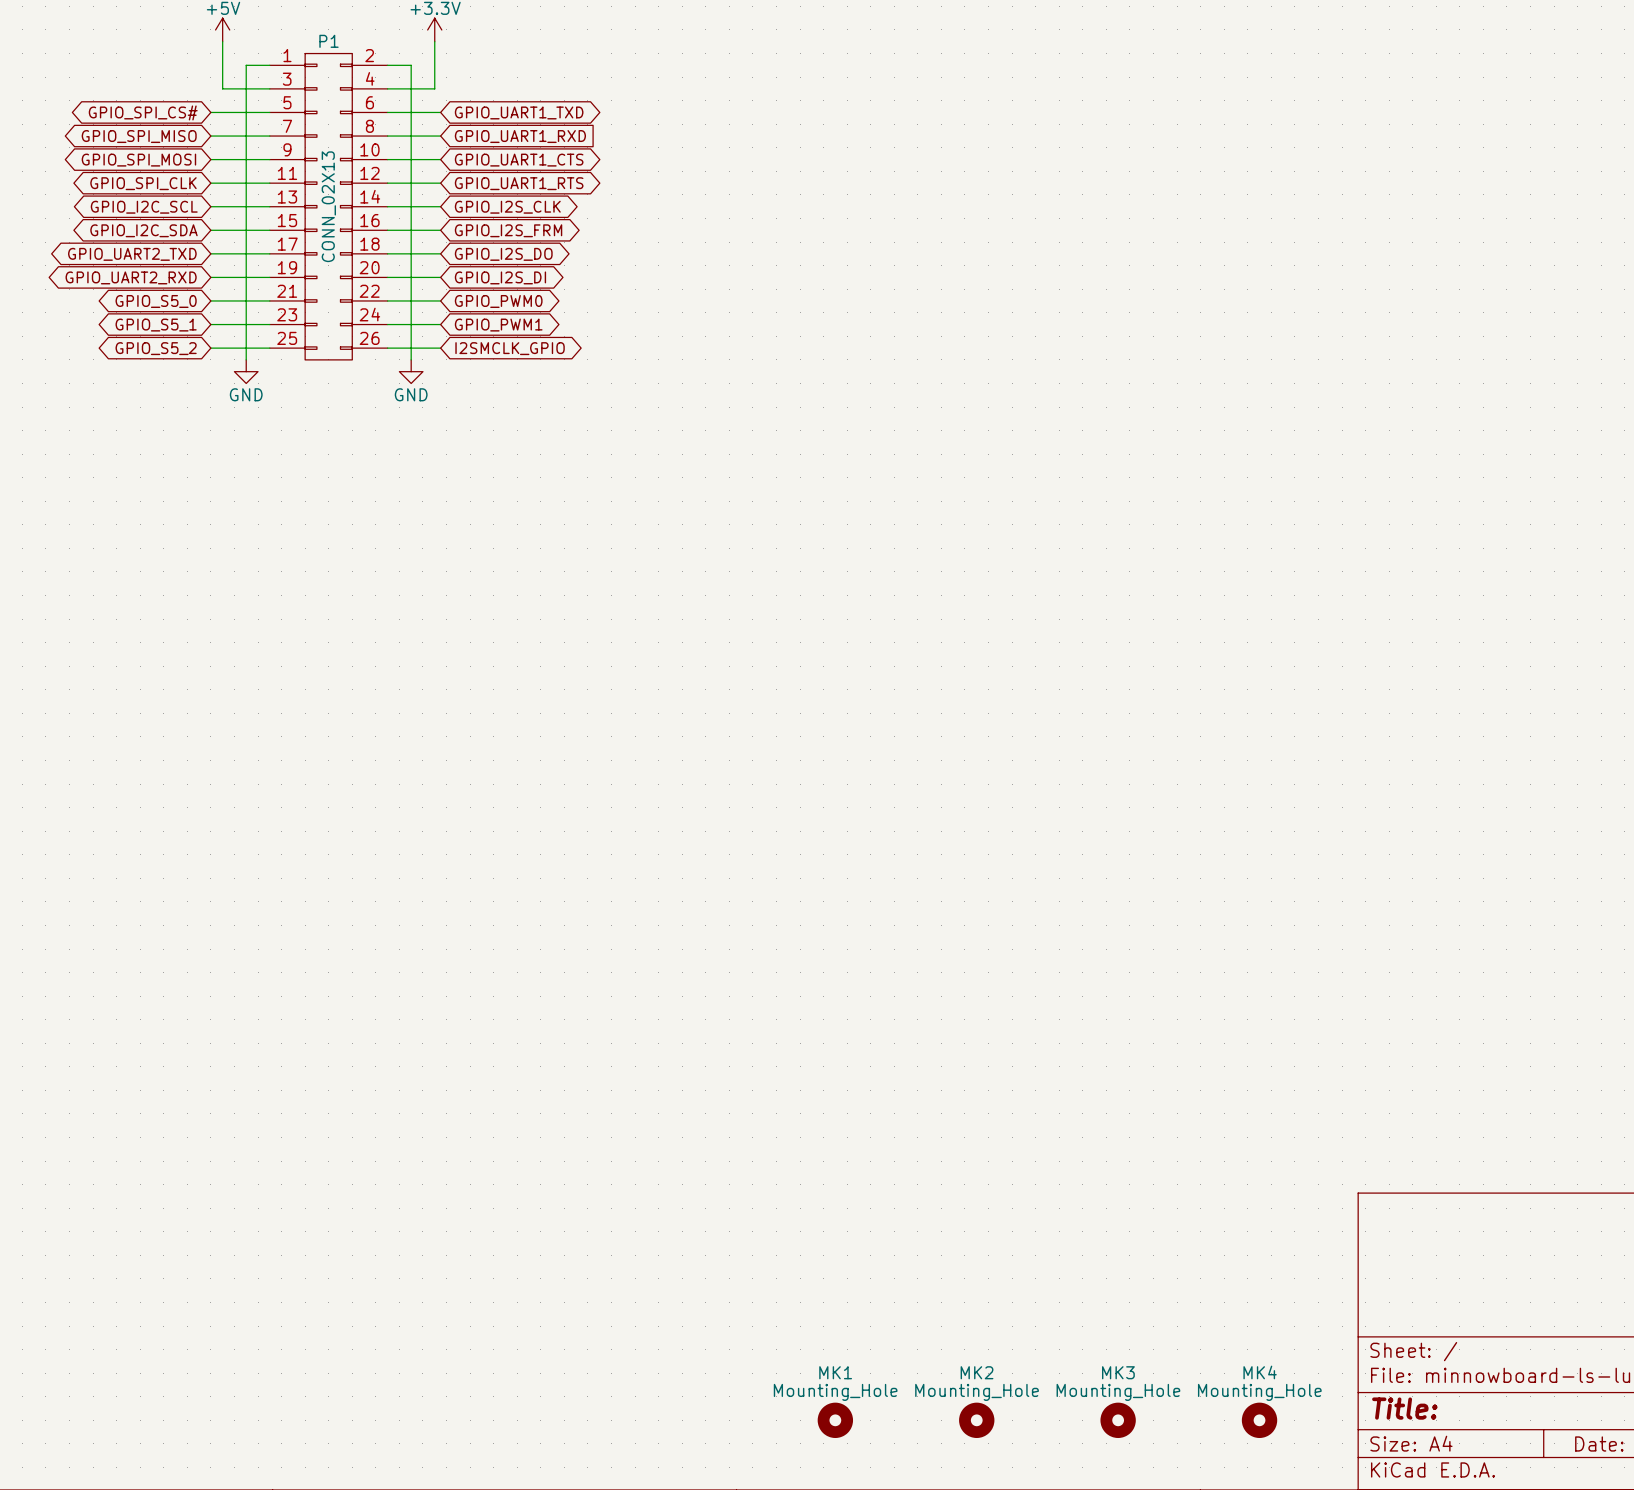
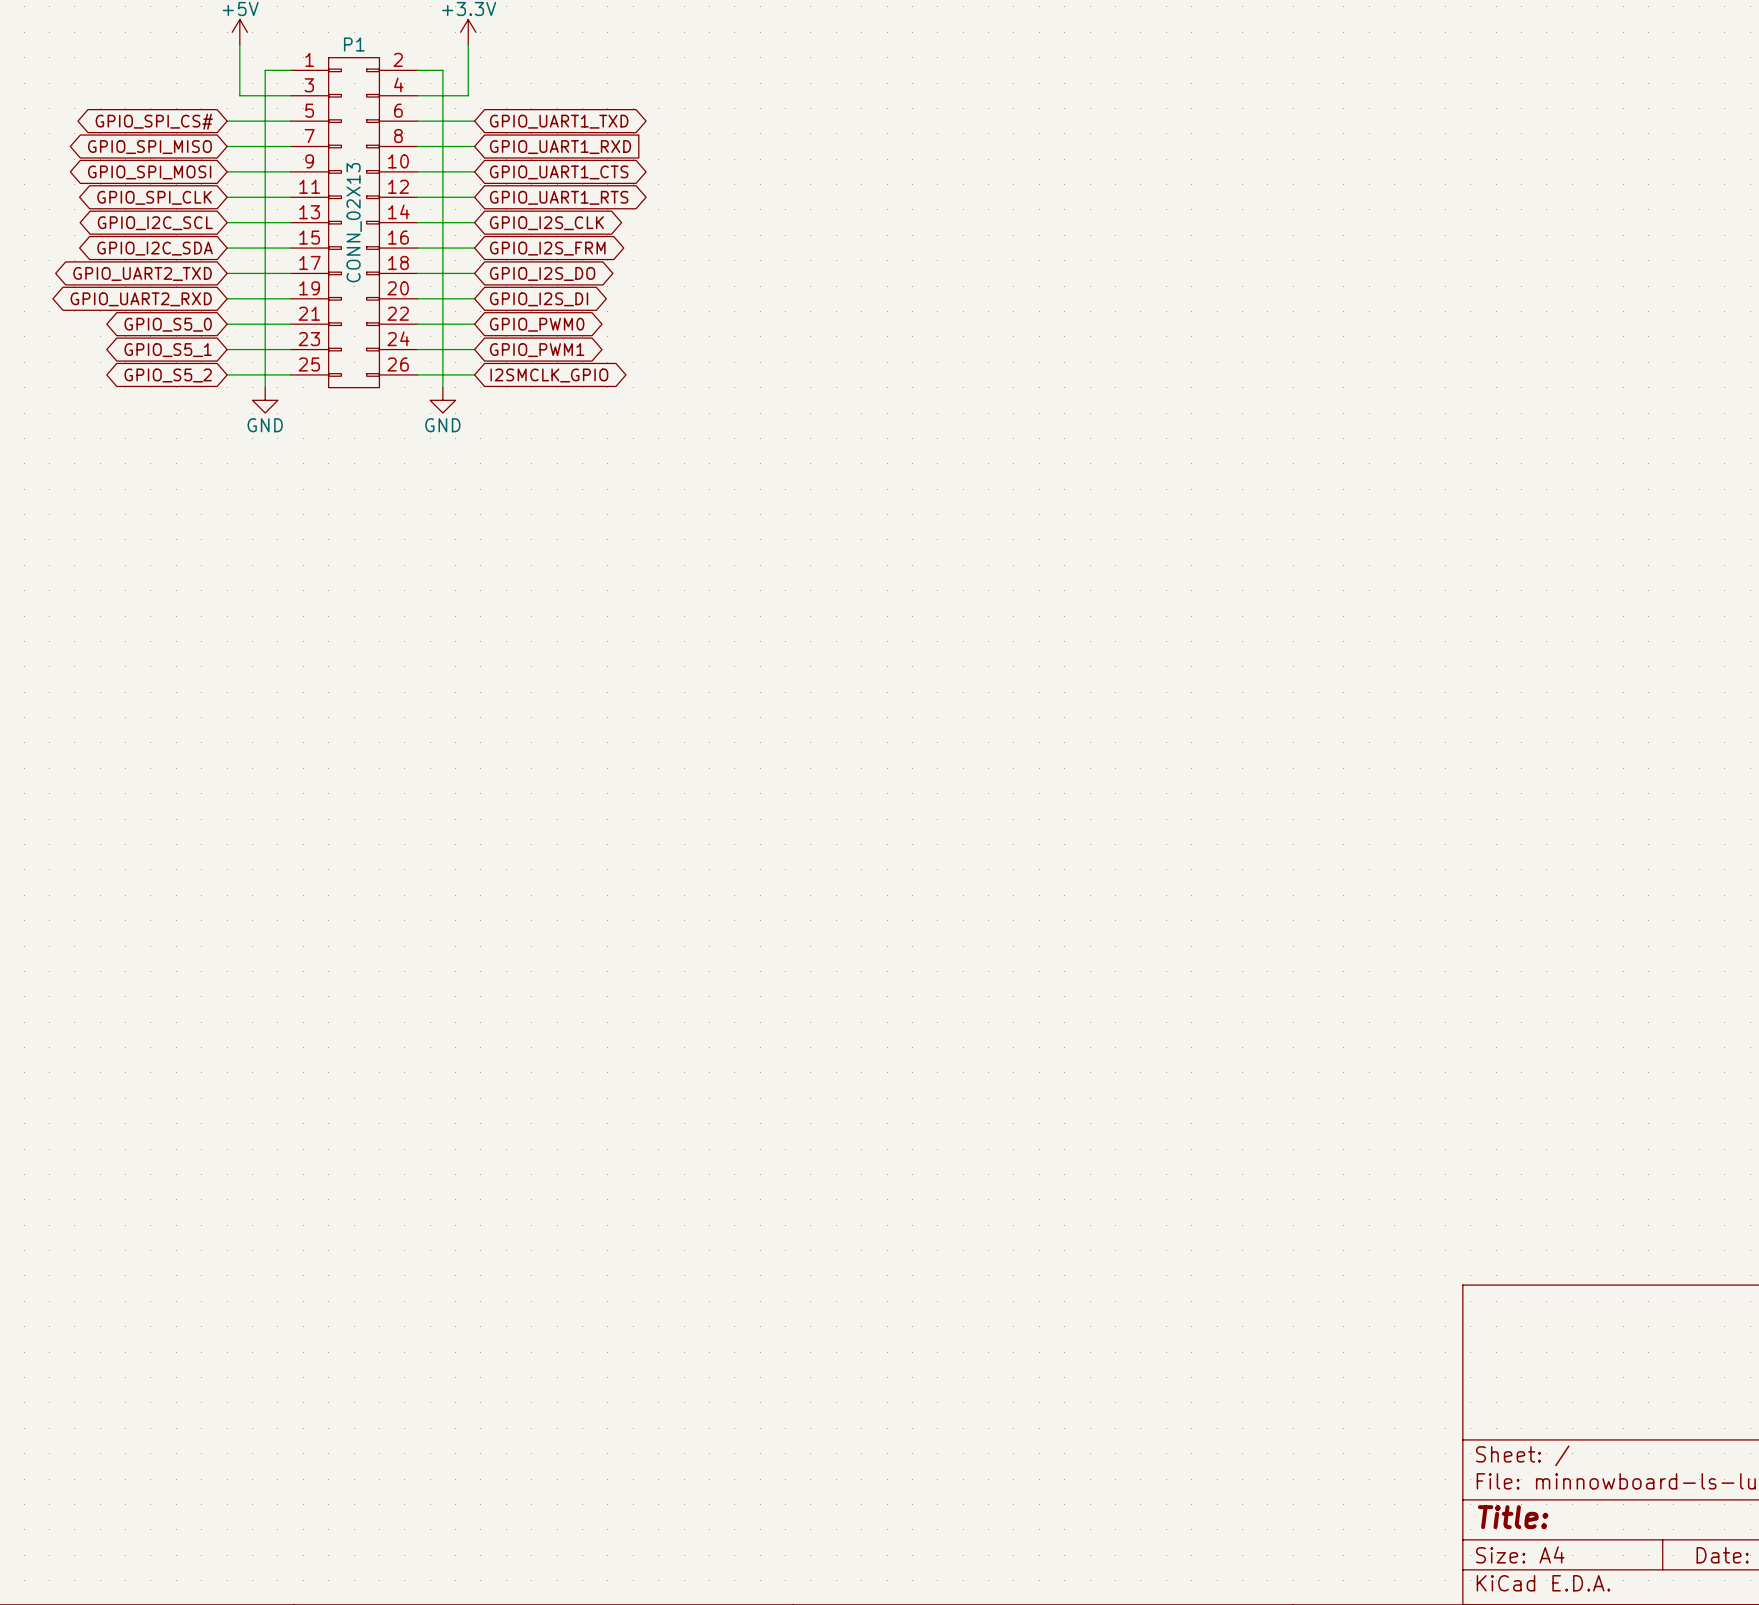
MK1: Mounting_Hole (835, 1420) -> none
MK2: Mounting_Hole (976, 1420) -> none
MK3: Mounting_Hole (1118, 1420) -> none
MK4: Mounting_Hole (1259, 1420) -> none

